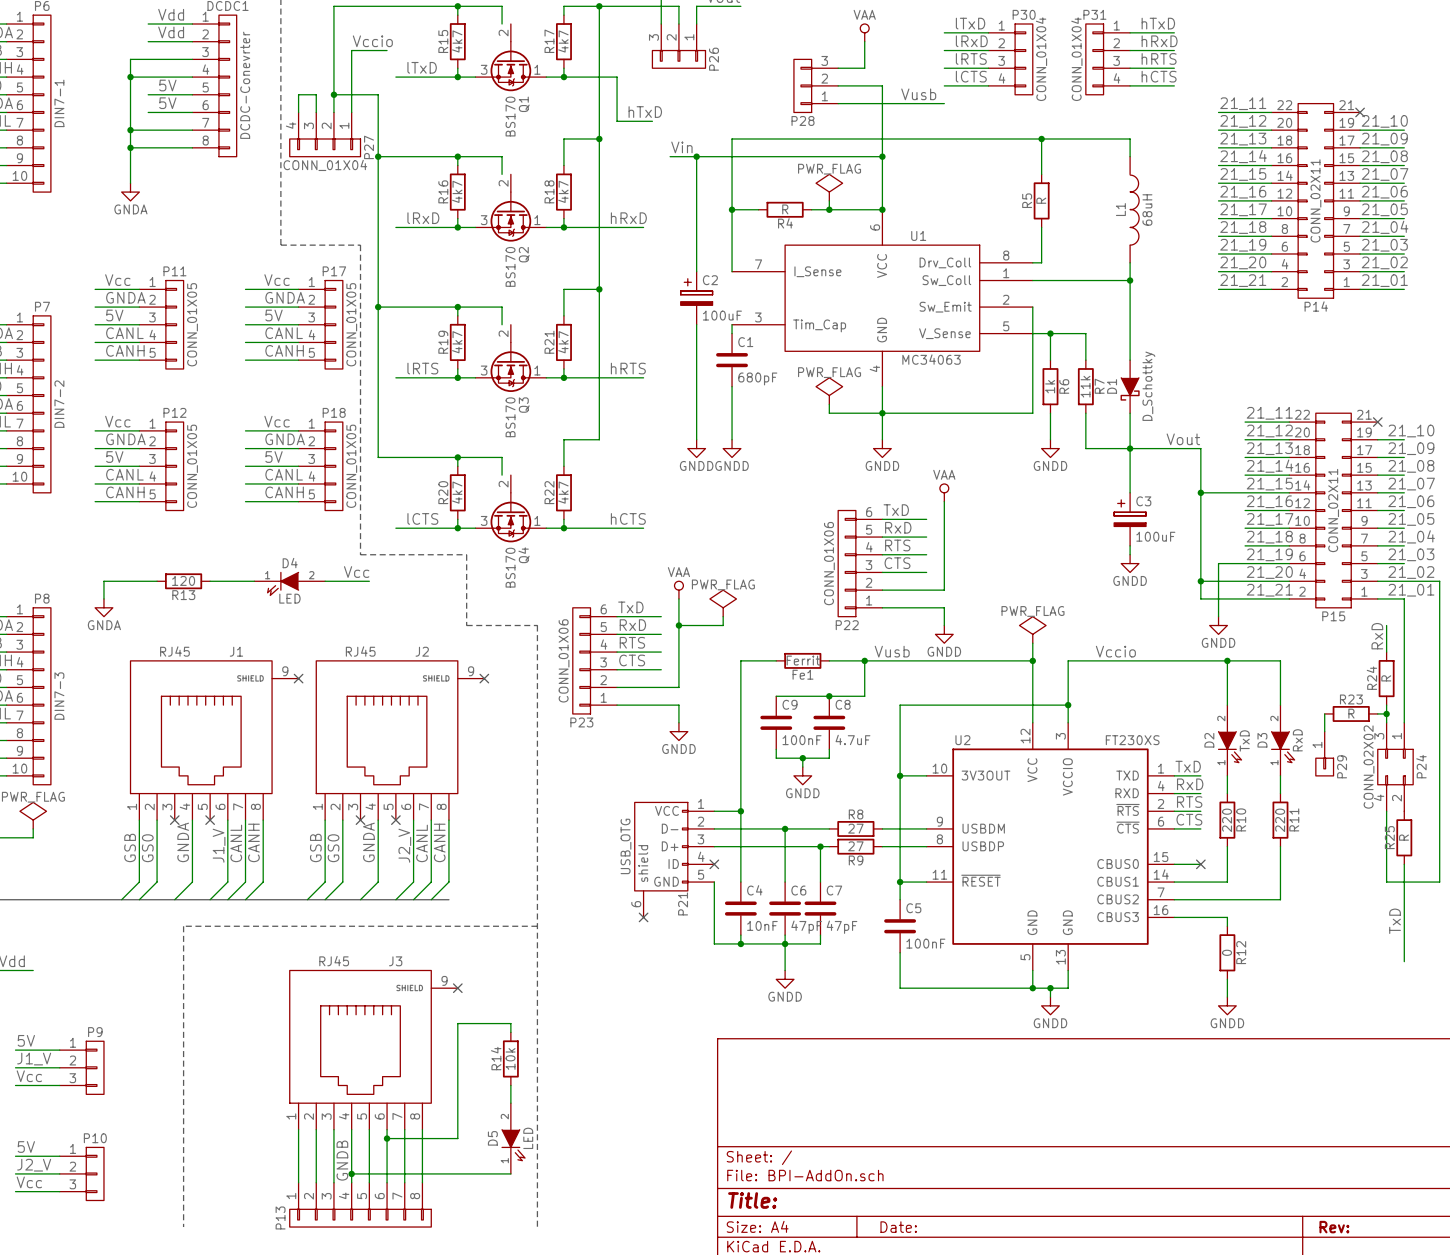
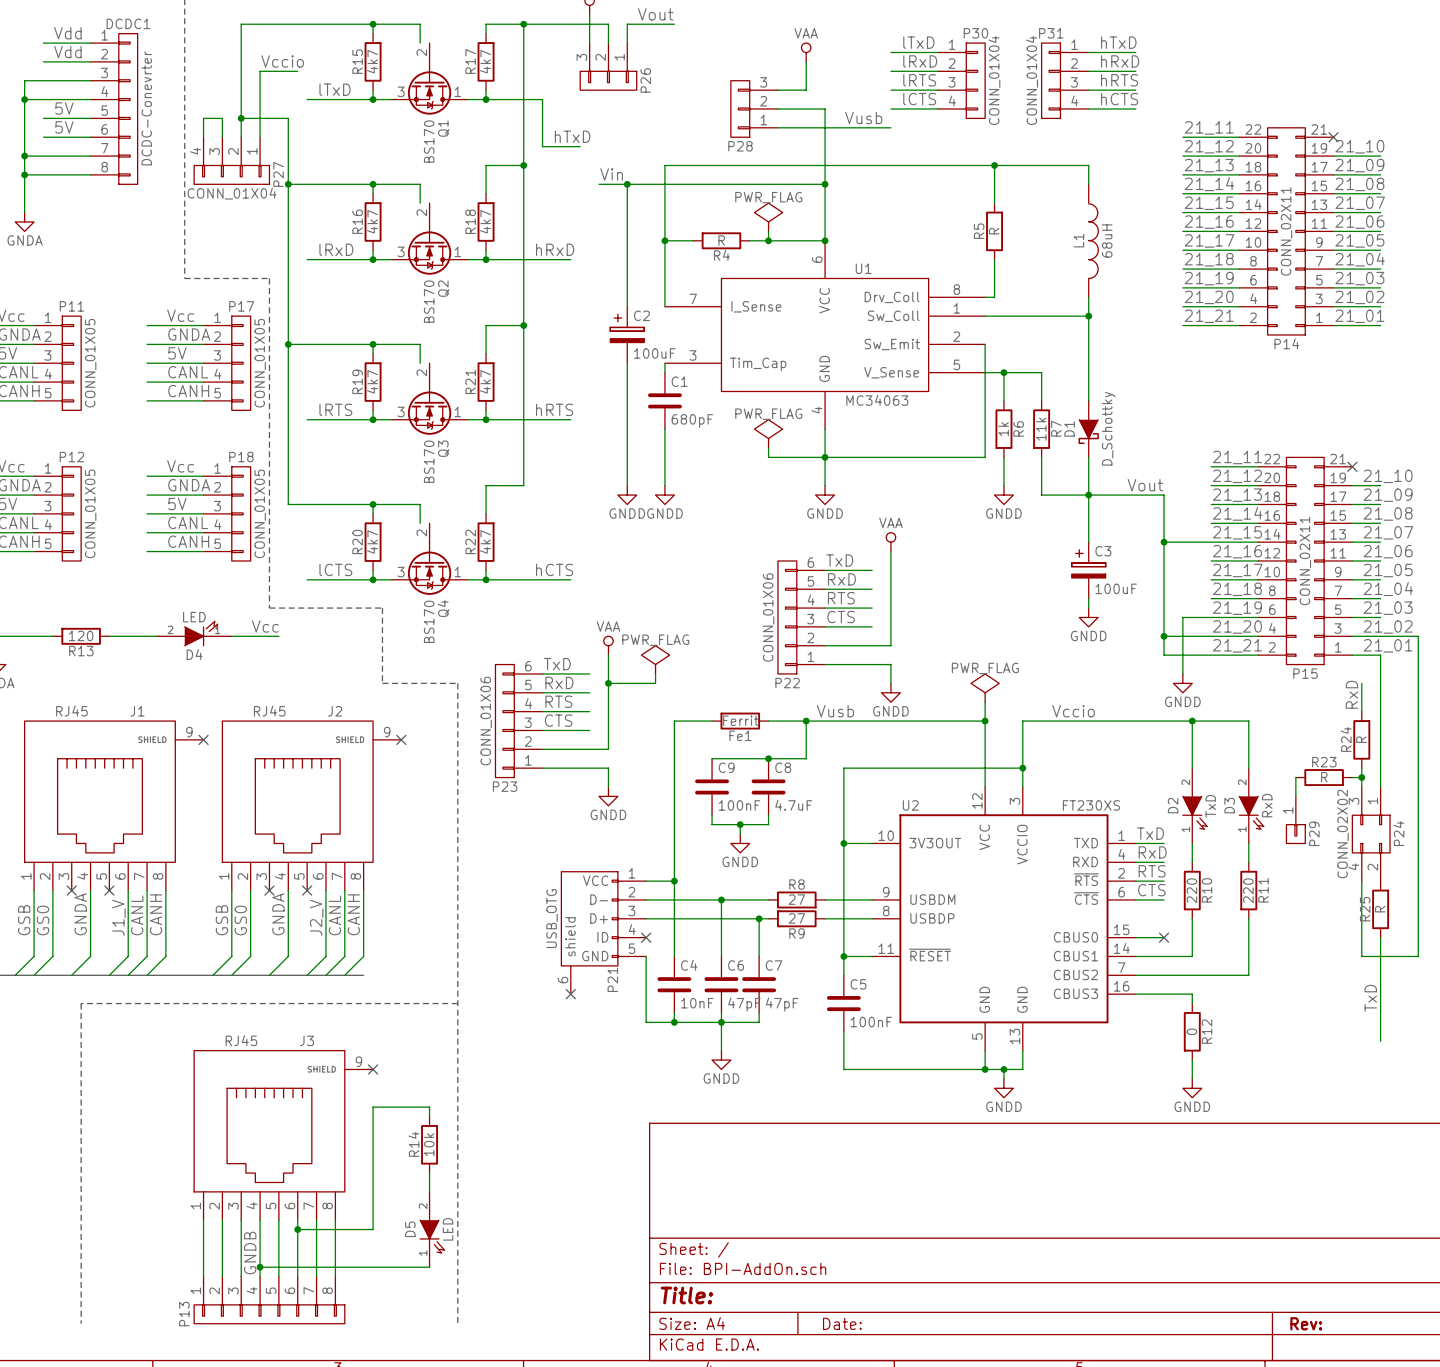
D4 rotation: 0° (283, 583) -> 180° (201, 633)

